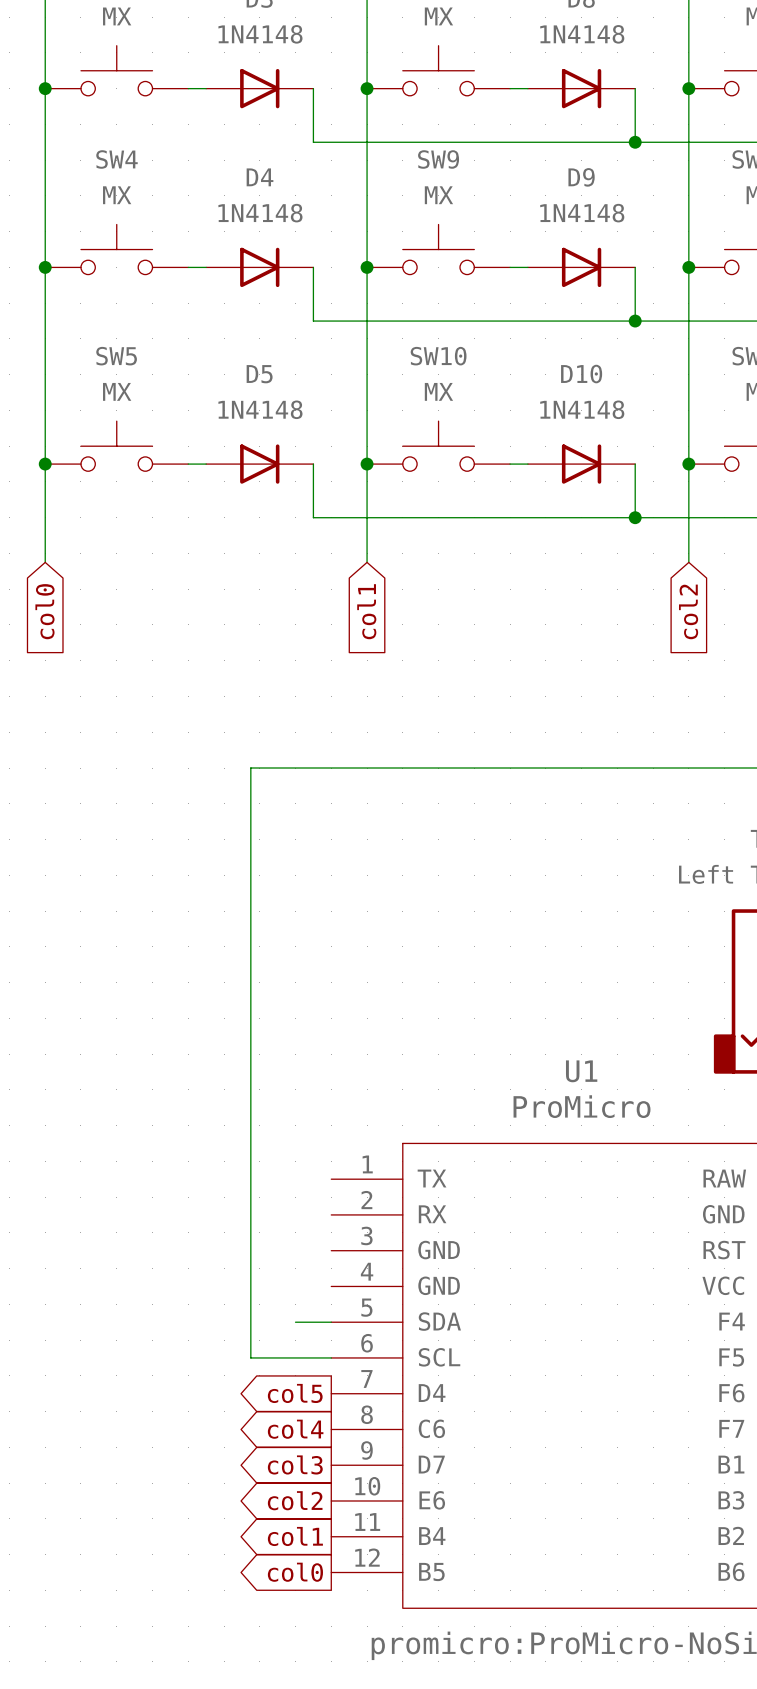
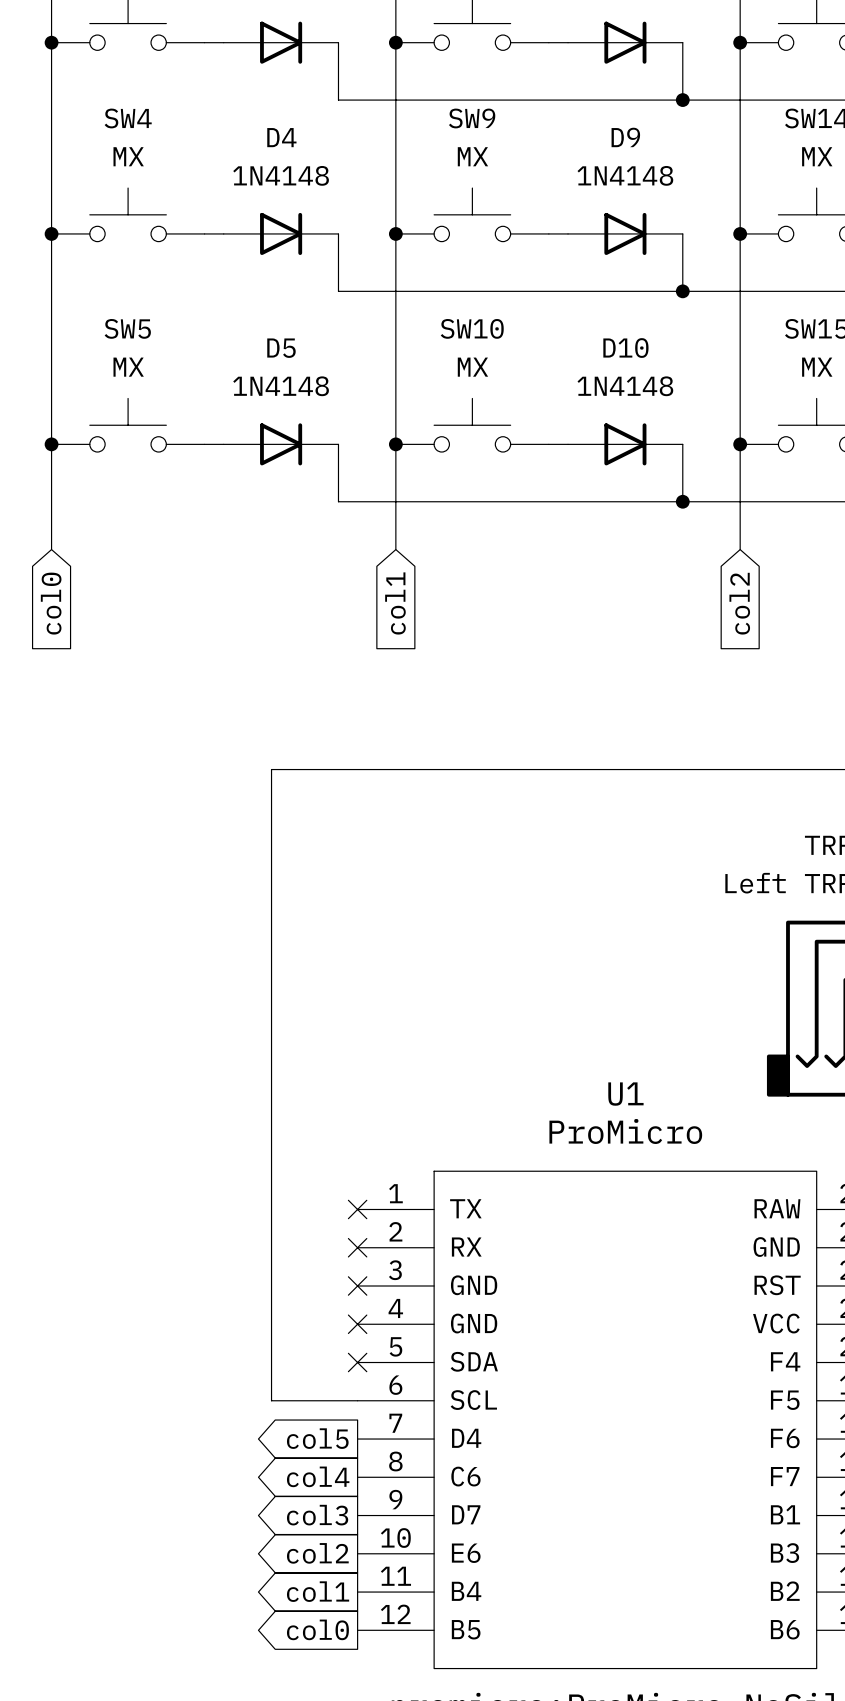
no-connect mark: none -> (357, 1209)
no-connect mark: none -> (357, 1247)
no-connect mark: none -> (357, 1286)
no-connect mark: none -> (357, 1324)
wire: (295, 1322) (331, 1322) -> none
no-connect mark: none -> (357, 1362)

